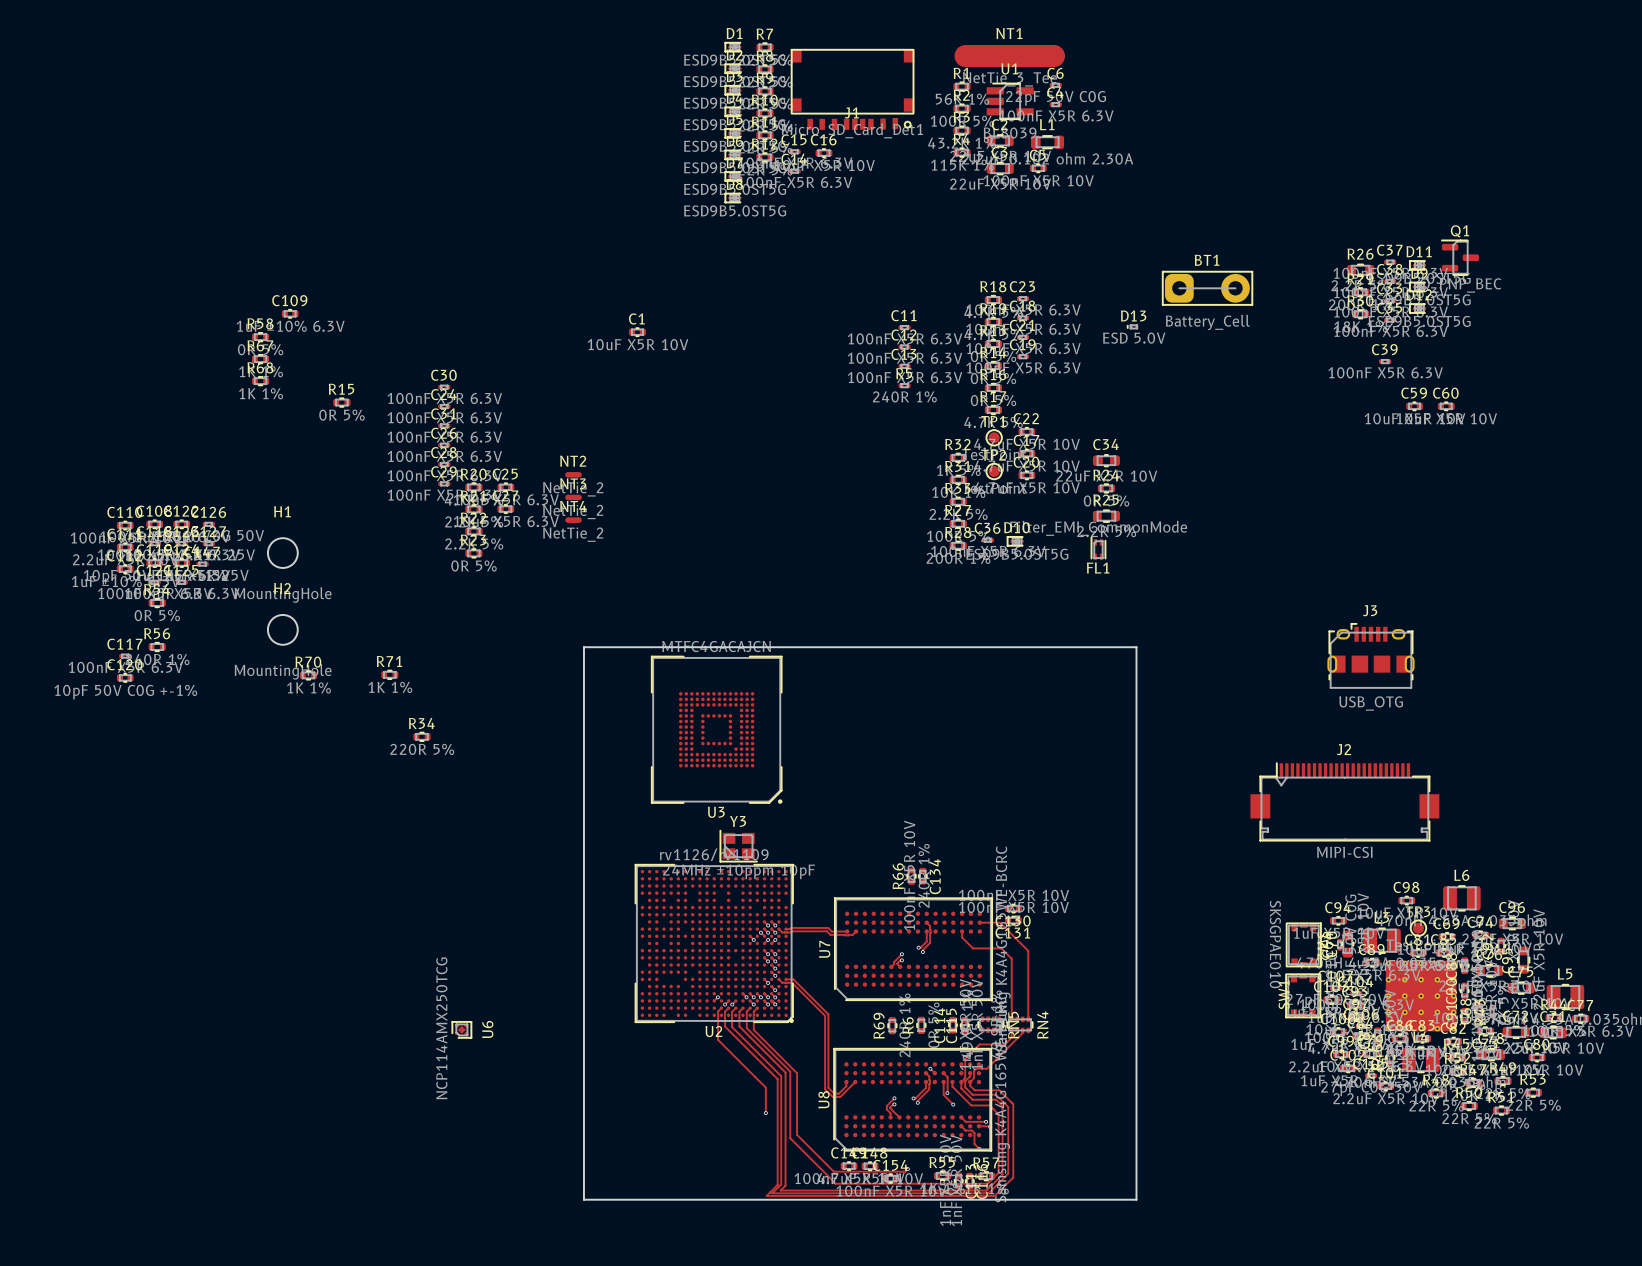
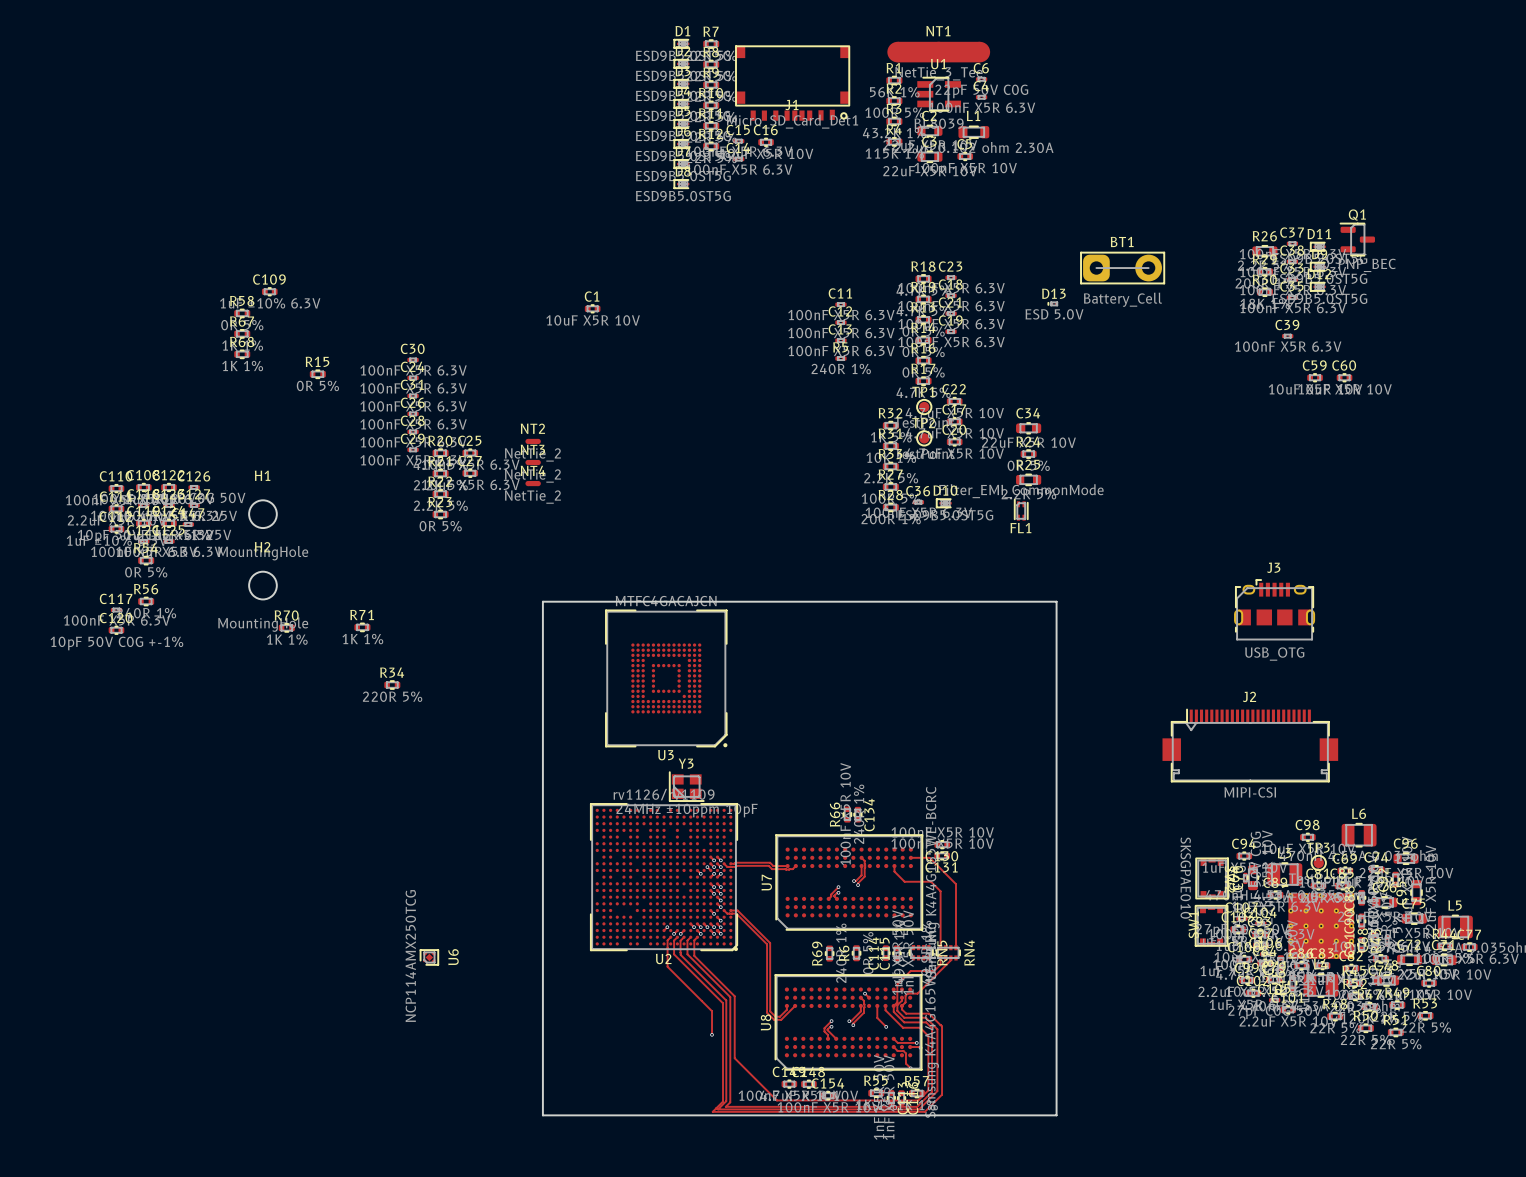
track: (757, 1008) (753, 1011) (753, 1029) (797, 1073) (797, 1134) (833, 1171) (905, 1171) (907, 1169) -> none
track: (943, 1073) (947, 1077) (947, 1093) -> none
via: (947, 1093) -> none
via: (907, 1169) -> none

